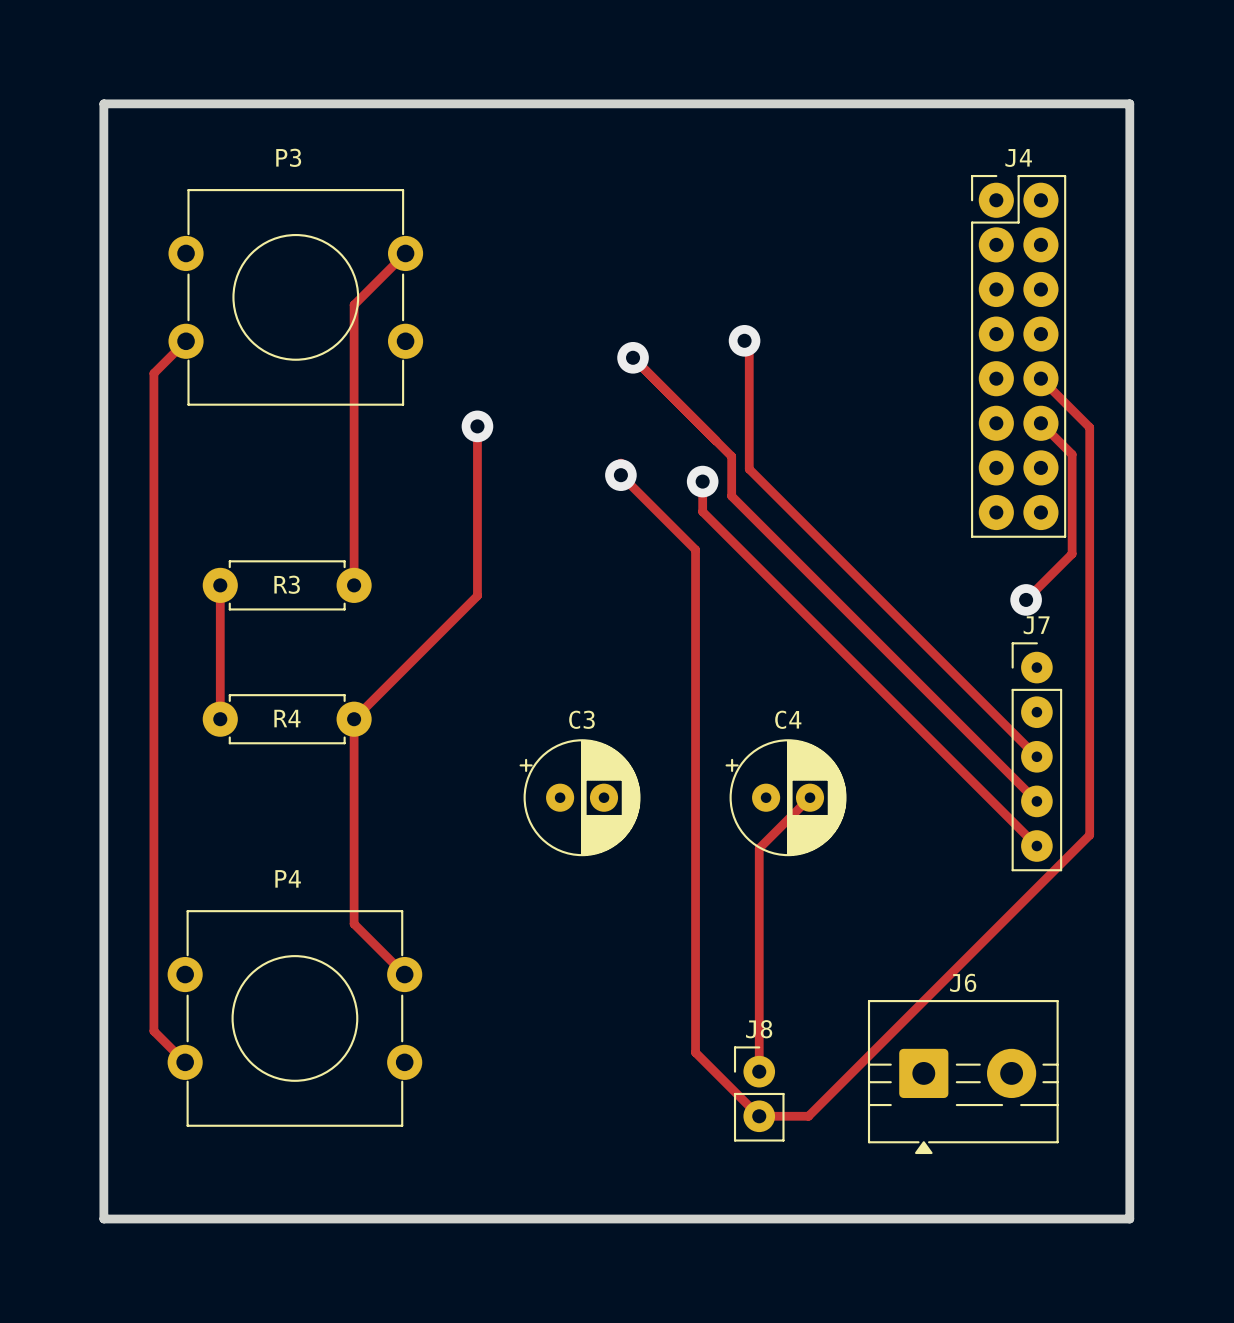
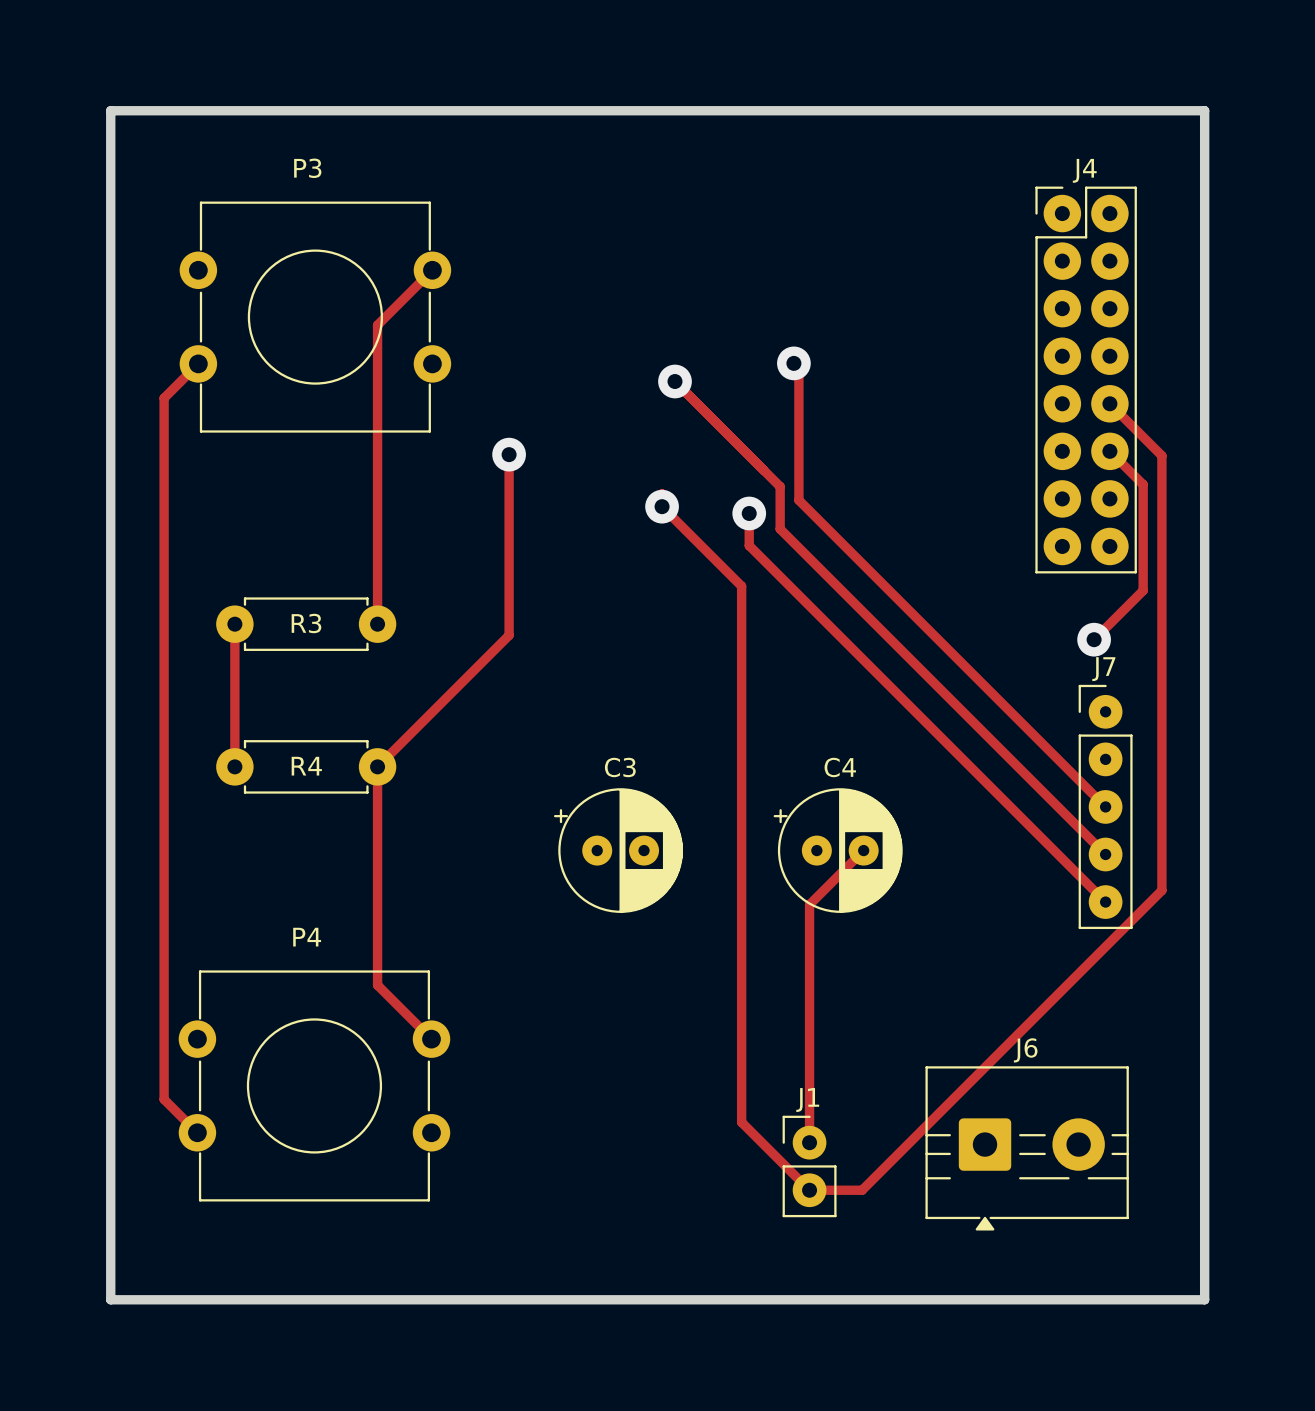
J8 name: J8 (759, 1029) -> J1 (807, 1099)

